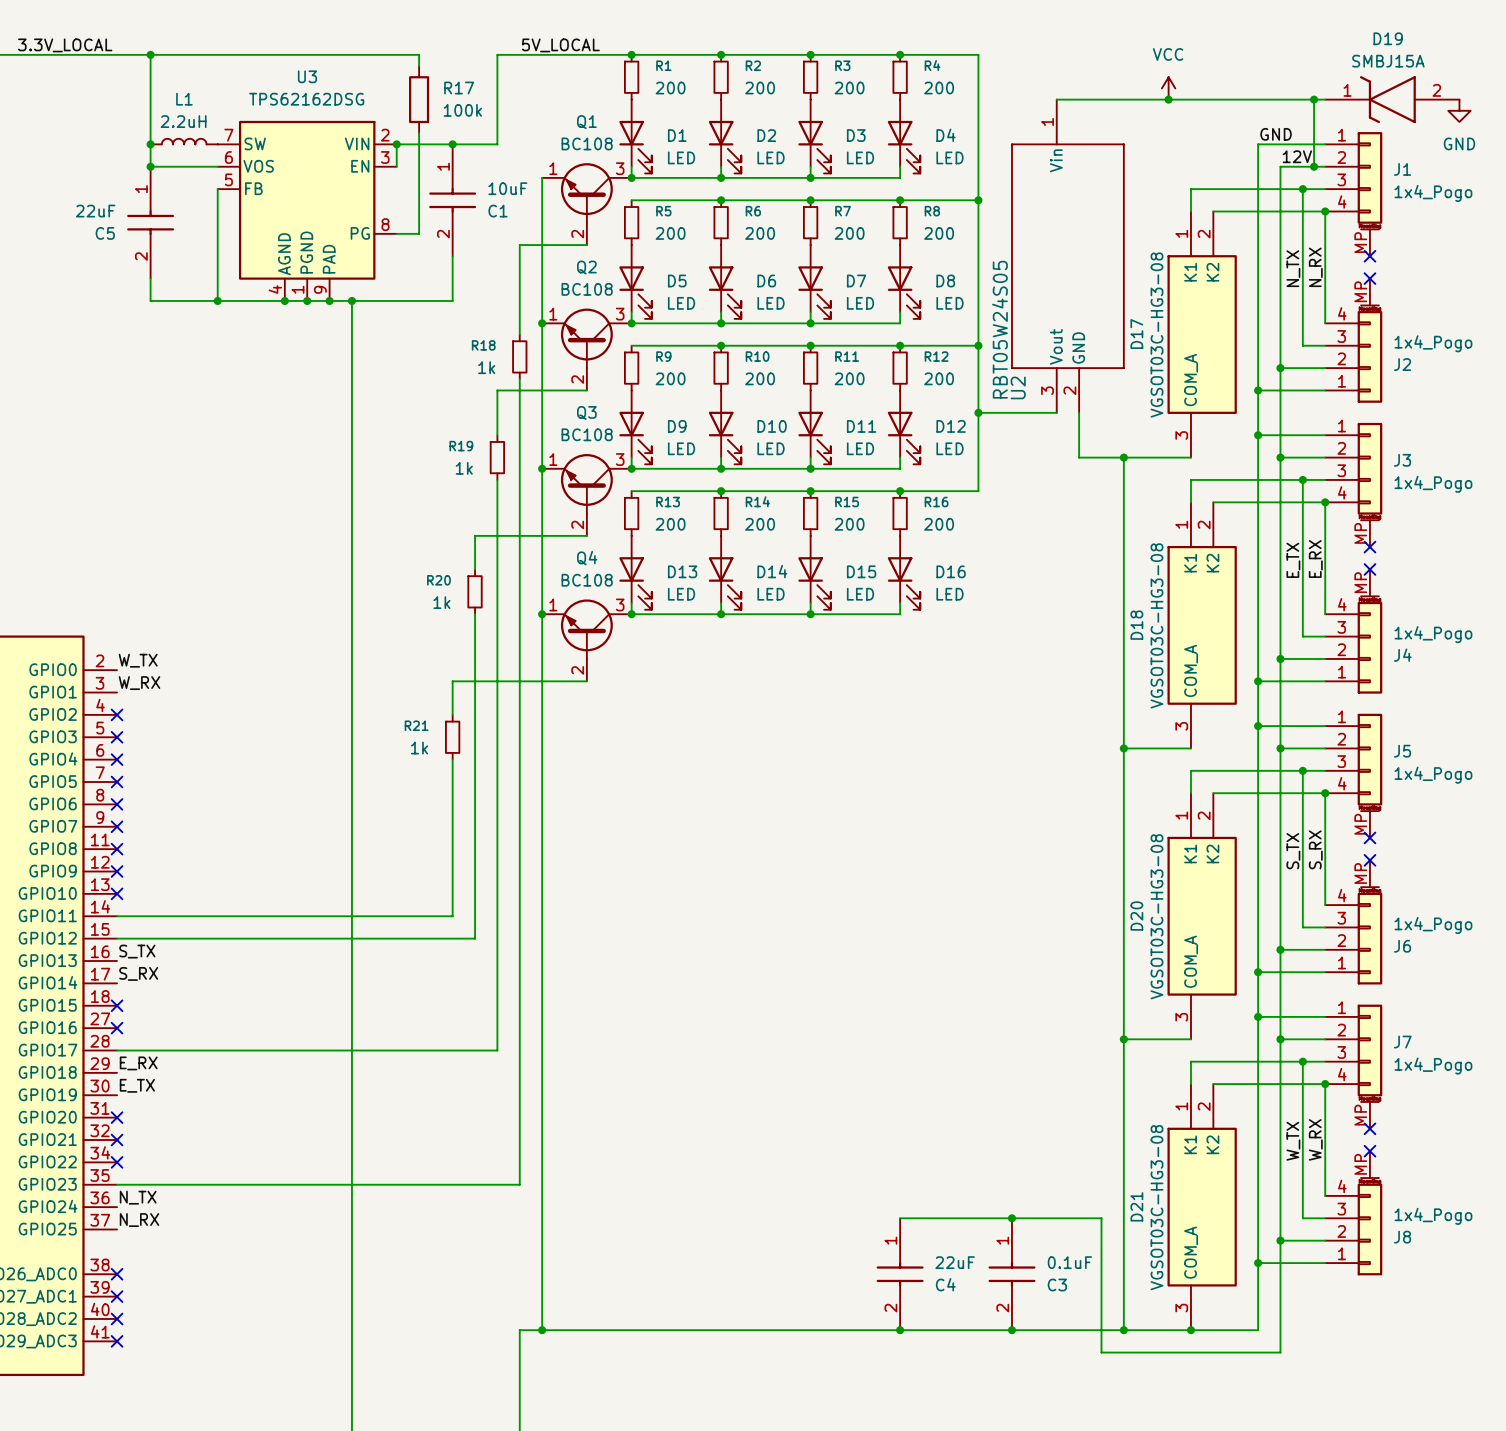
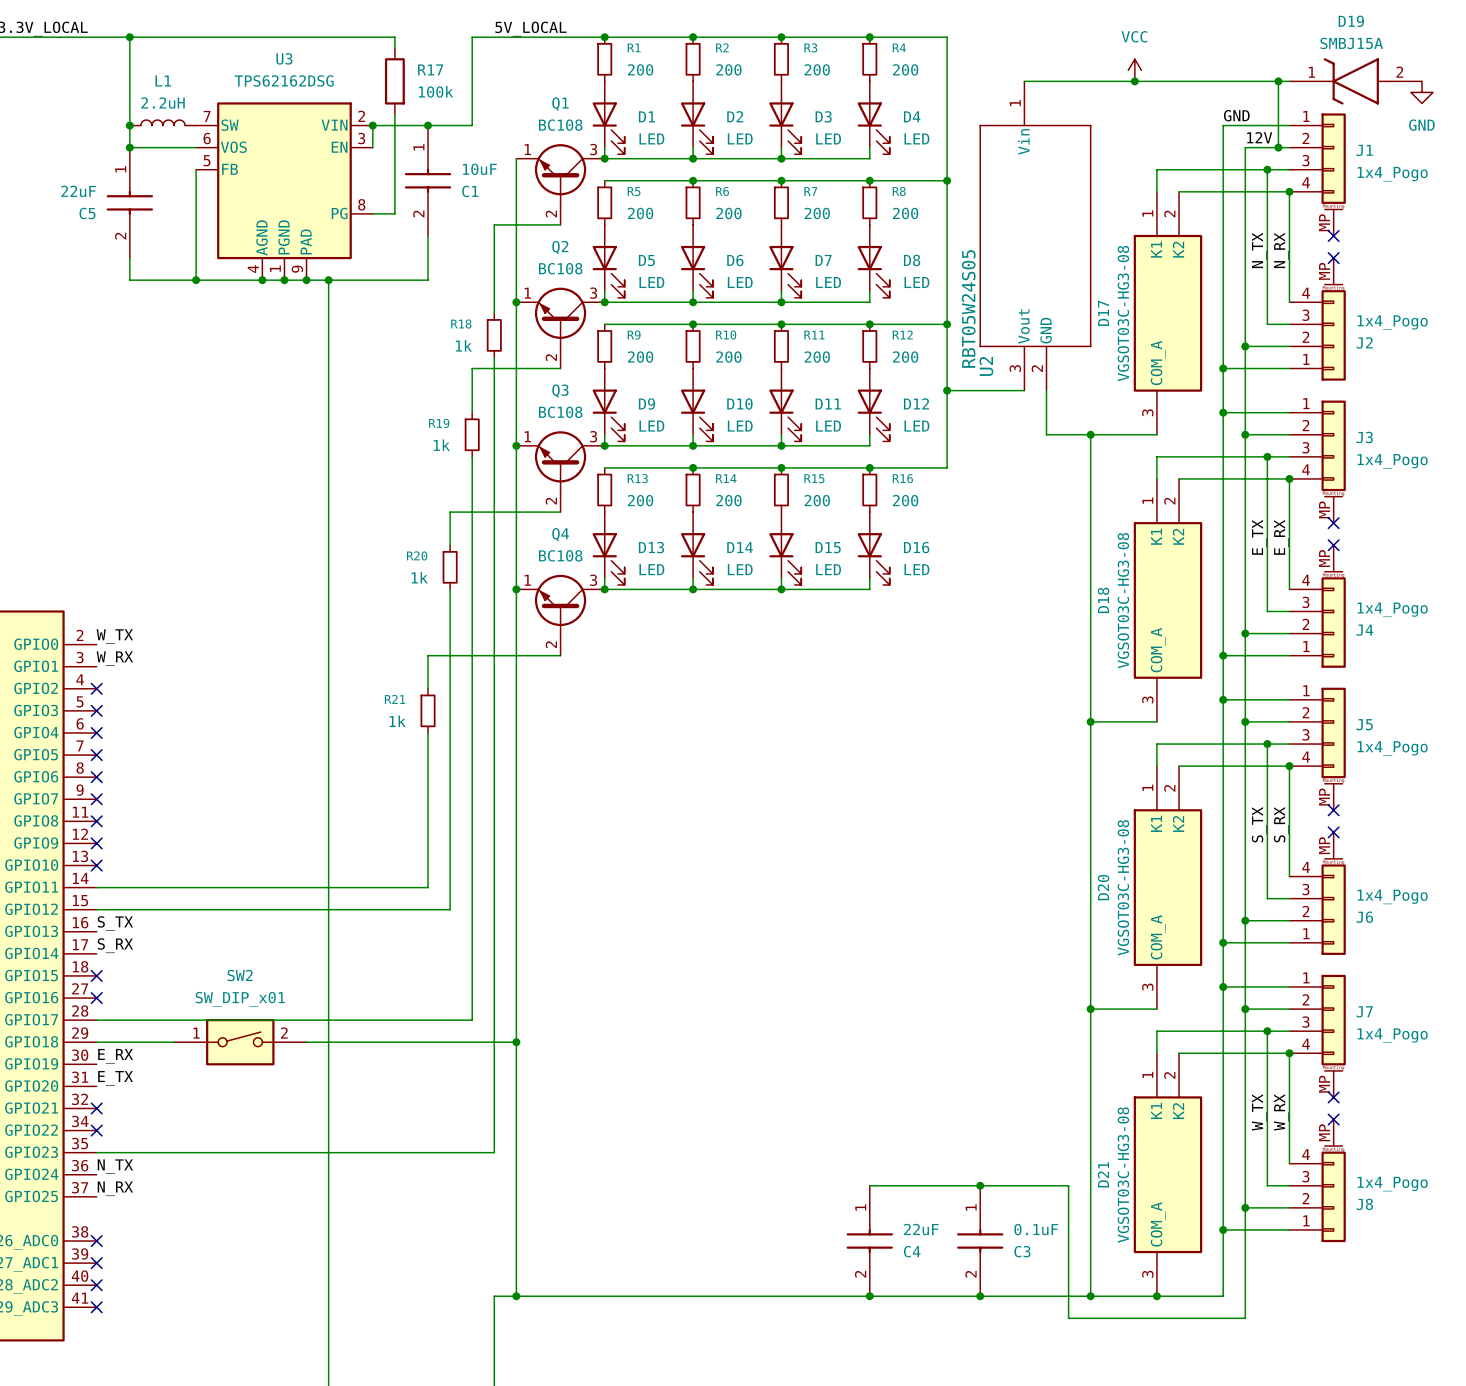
label: E_RX (138, 1063) -> none
wire: none -> (96, 1042) (174, 1042)
SW2: none -> SW_DIP_x01 (240, 1042)
wire: none -> (306, 1042) (516, 1042)
junction: none -> (516, 1042)
label: E_TX (137, 1085) -> E_RX (115, 1056)
label: none -> E_TX (115, 1078)
no-connect mark: (117, 1117) -> none

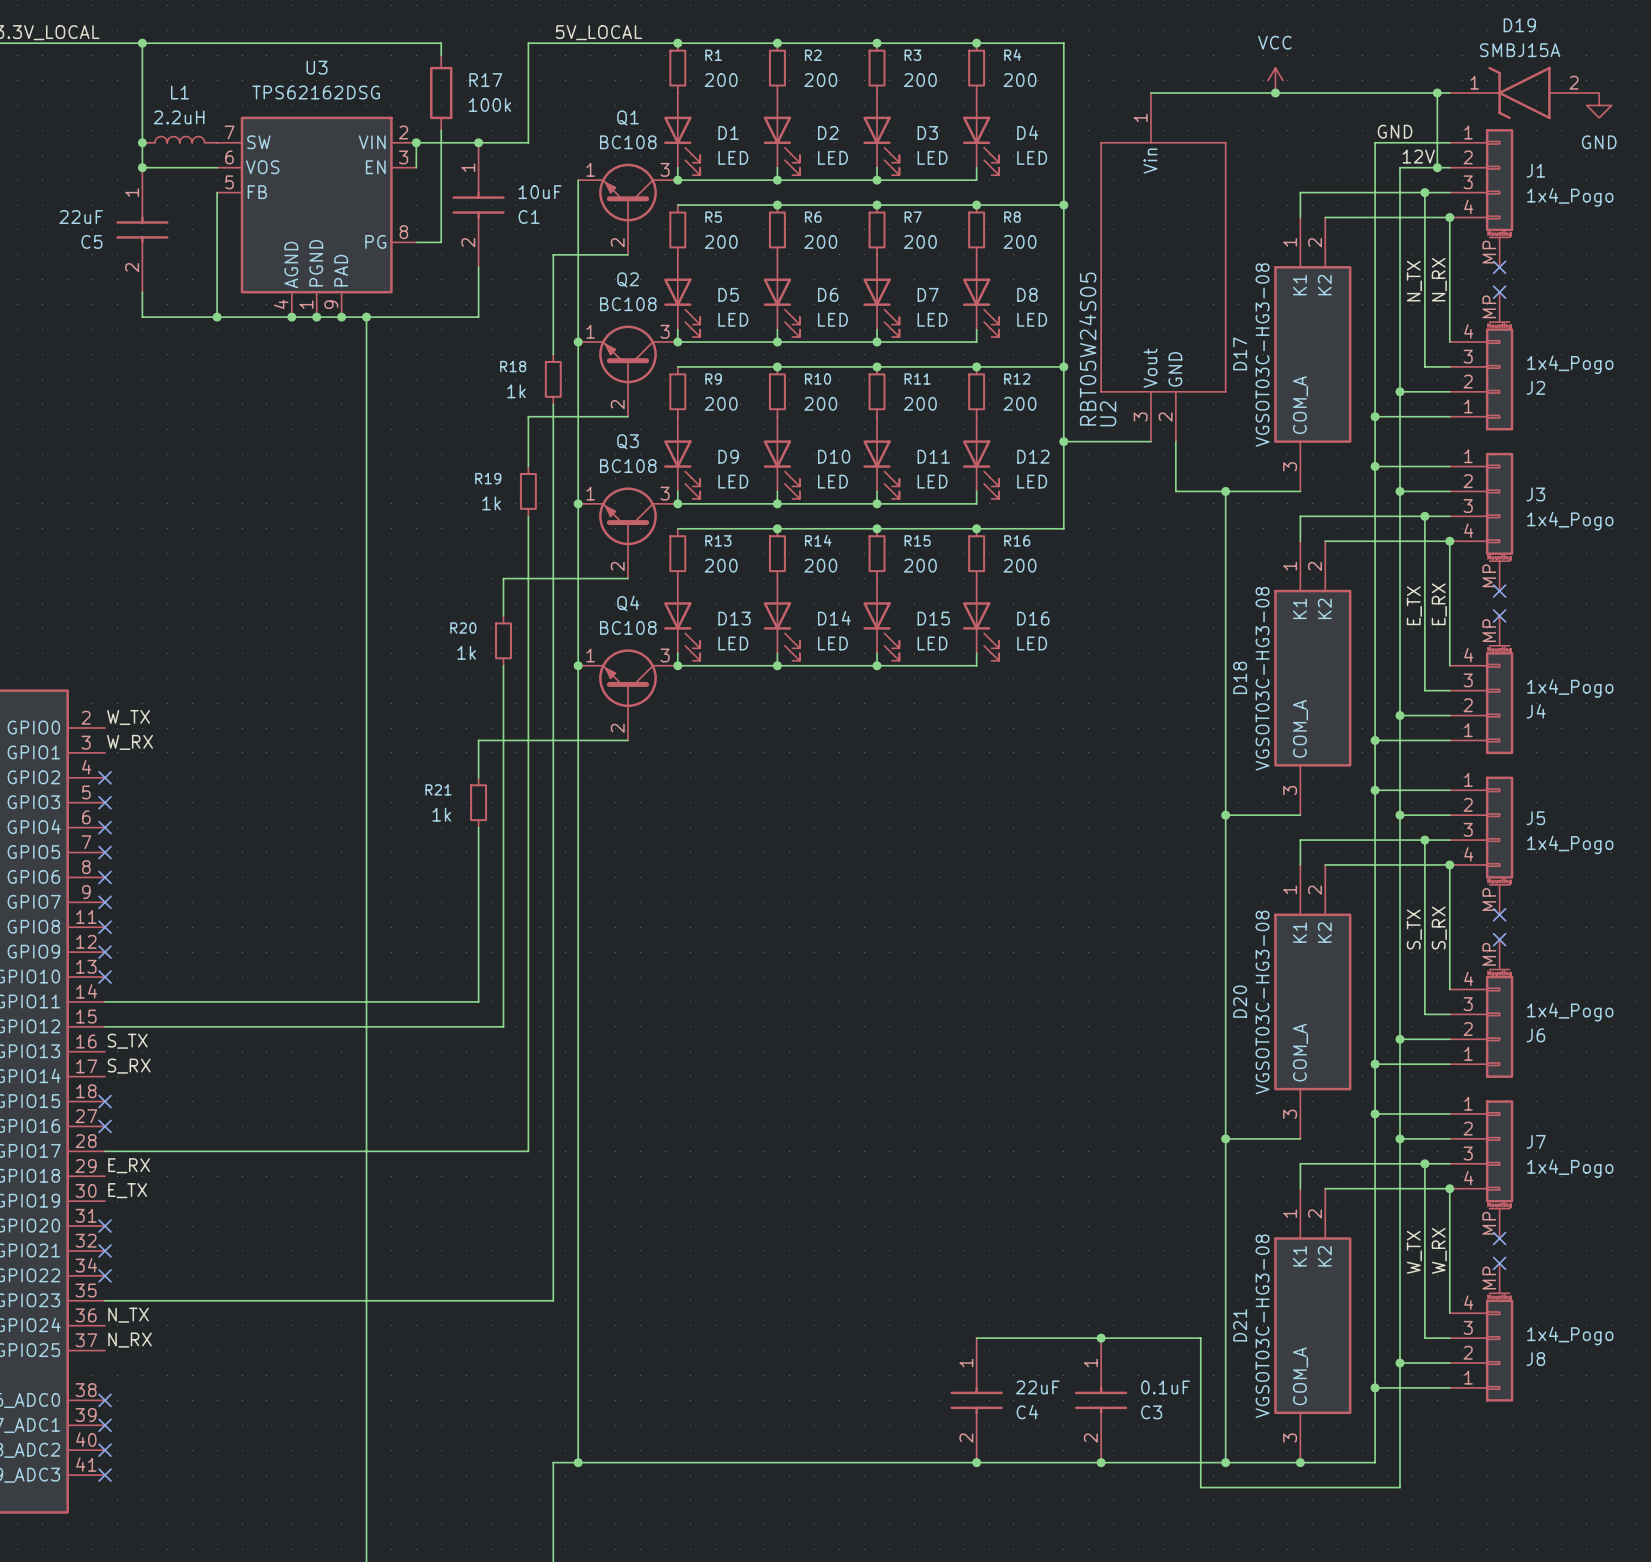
label: none -> E_RX (129, 1165)
wire: (96, 1042) (174, 1042) -> none
SW2: SW_DIP_x01 (240, 1042) -> none
wire: (306, 1042) (516, 1042) -> none
junction: (516, 1042) -> none
label: E_RX (115, 1056) -> E_TX (127, 1190)
label: E_TX (115, 1078) -> none
no-connect mark: none -> (105, 1226)

